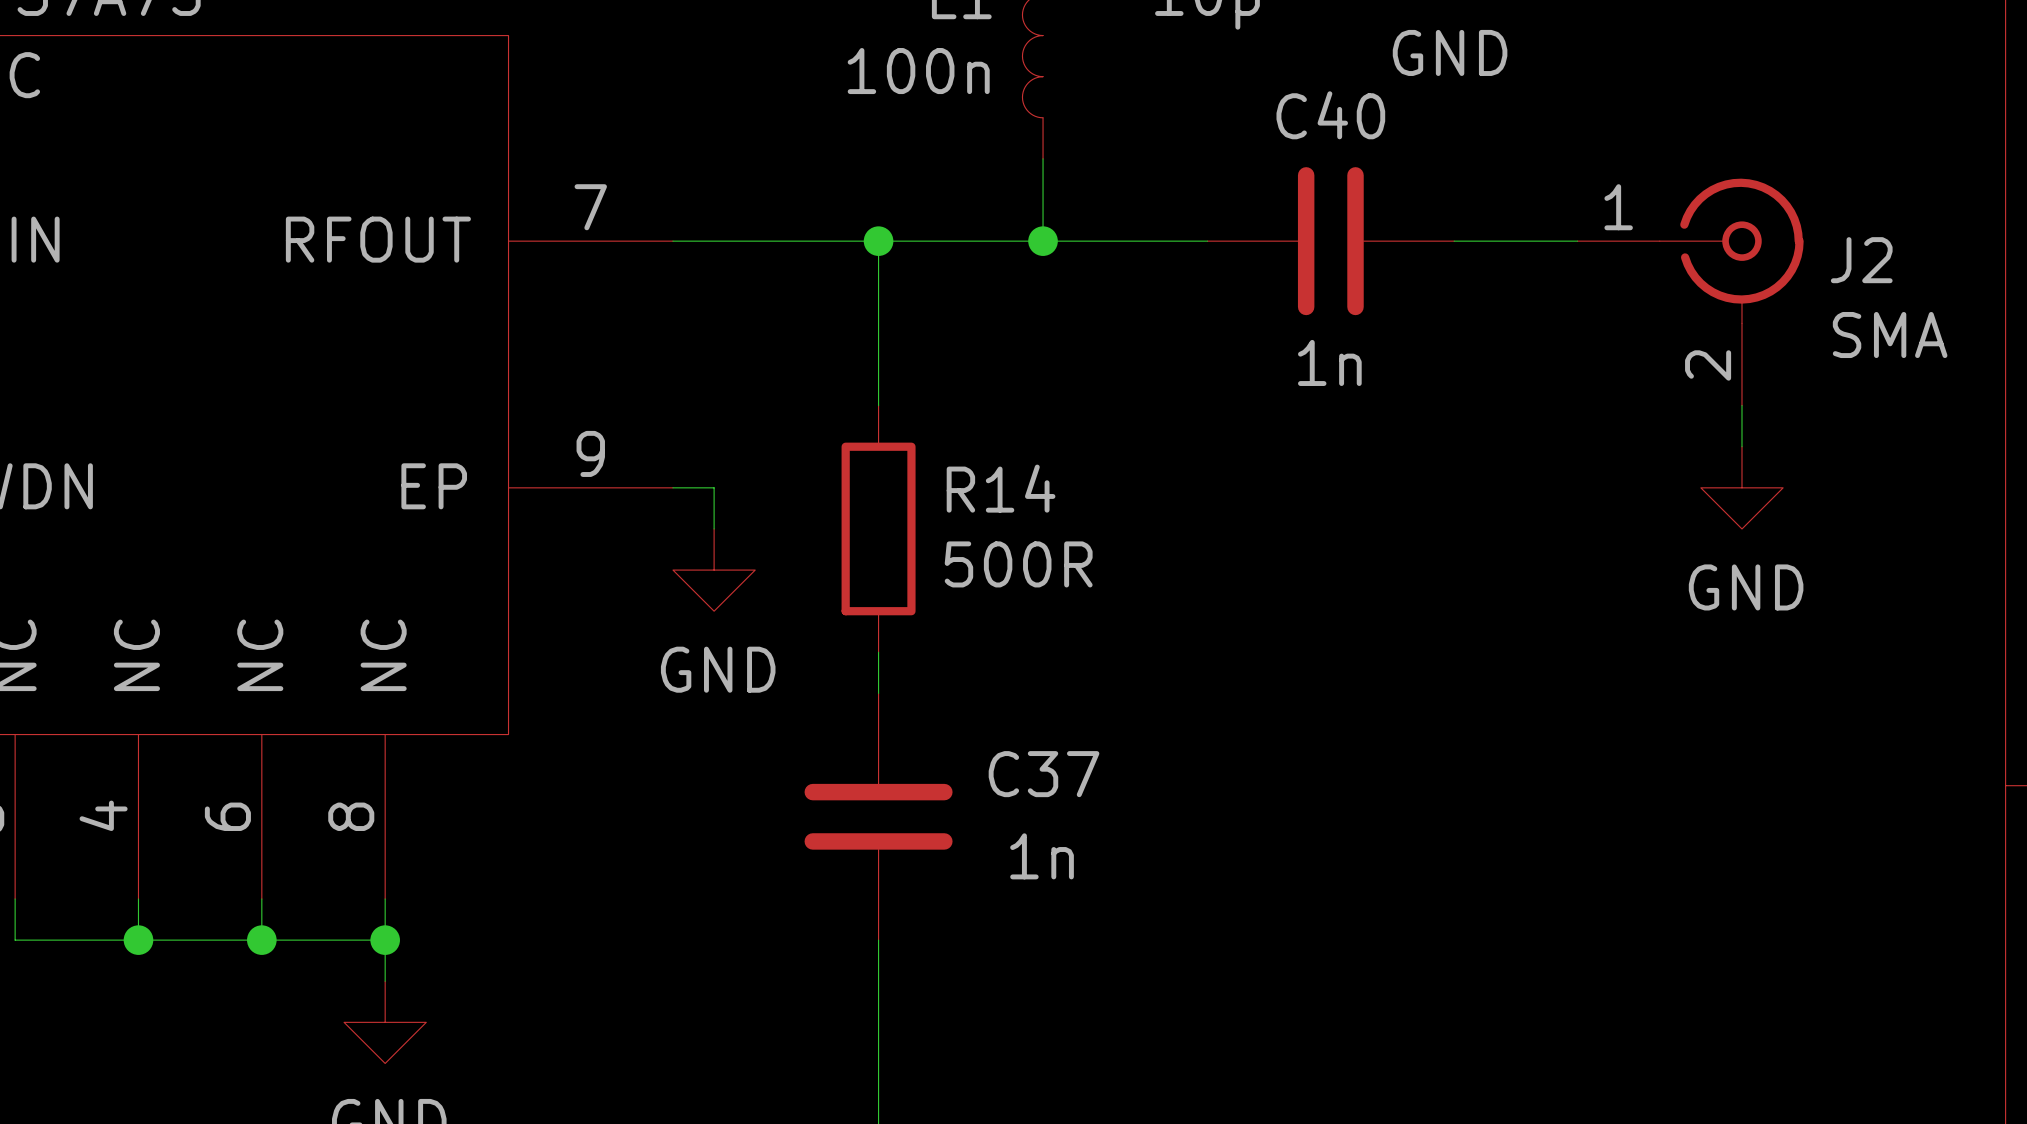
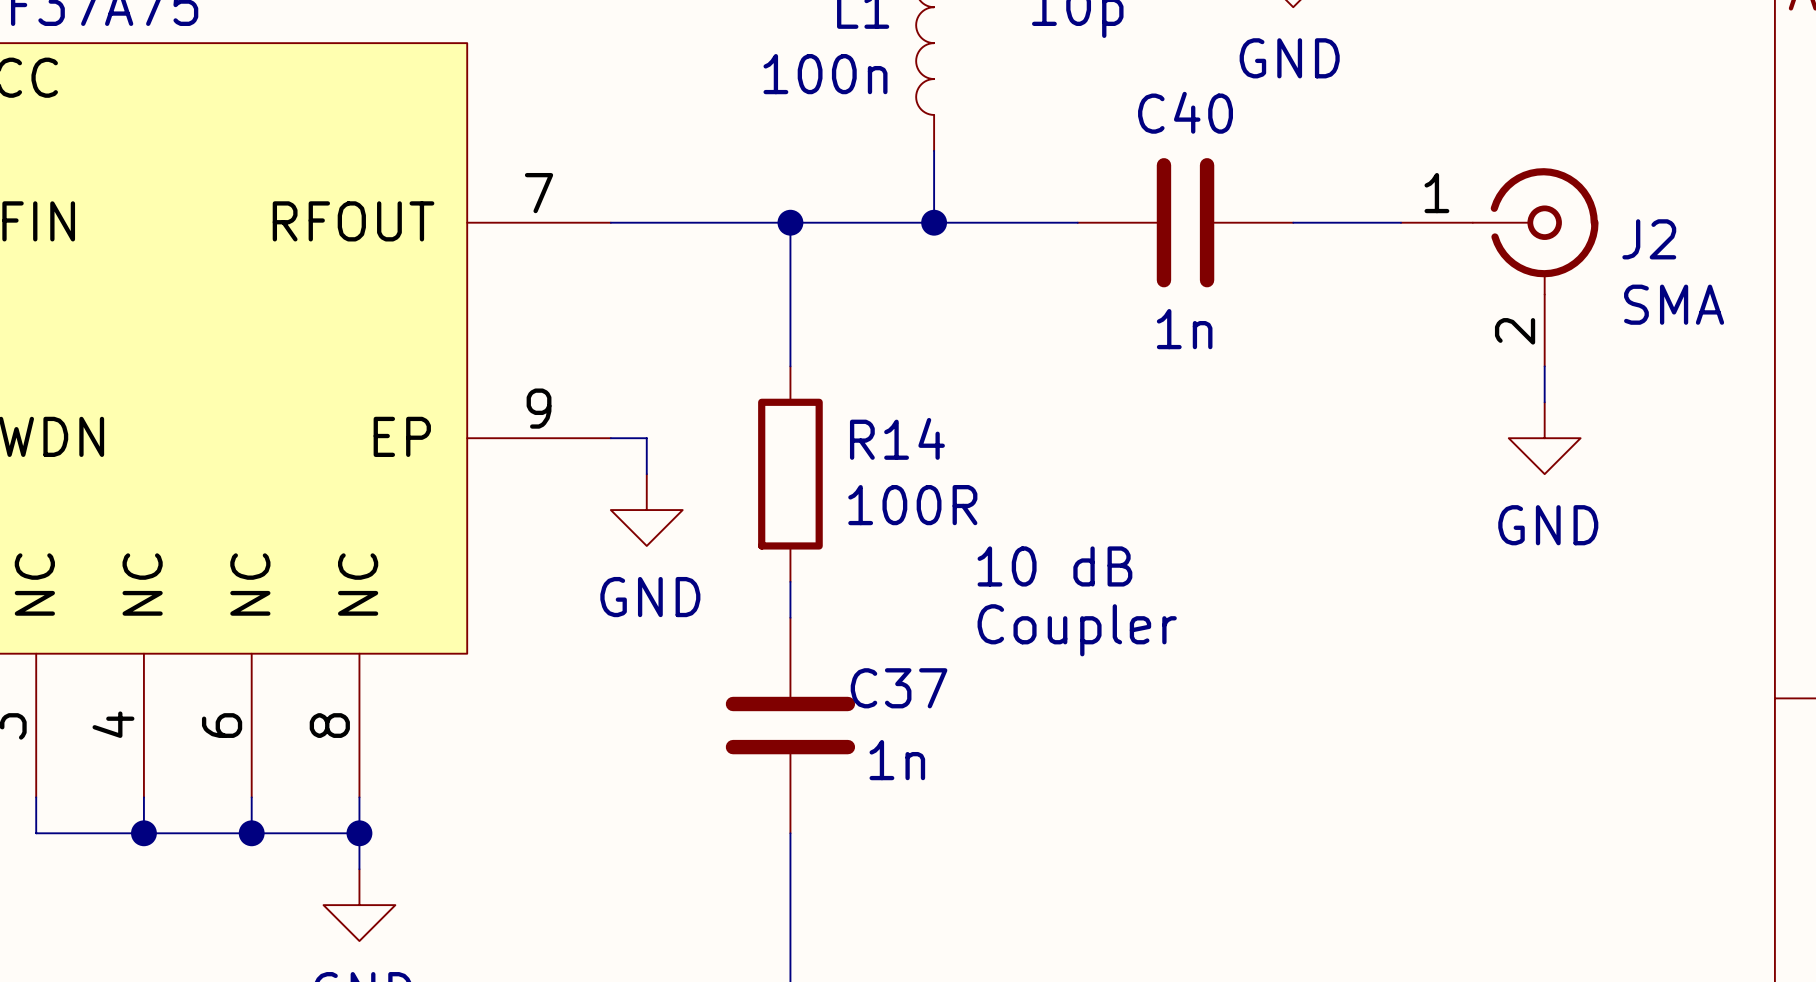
R14 value: 500R (1018, 564) -> 100R (912, 505)
text: none -> 10 dB (1054, 566)
text: none -> Coupler (1077, 630)
C37 name position: C37 (1044, 774) -> C37 (899, 688)
C37 value position: 1n (1042, 856) -> 1n (897, 760)

